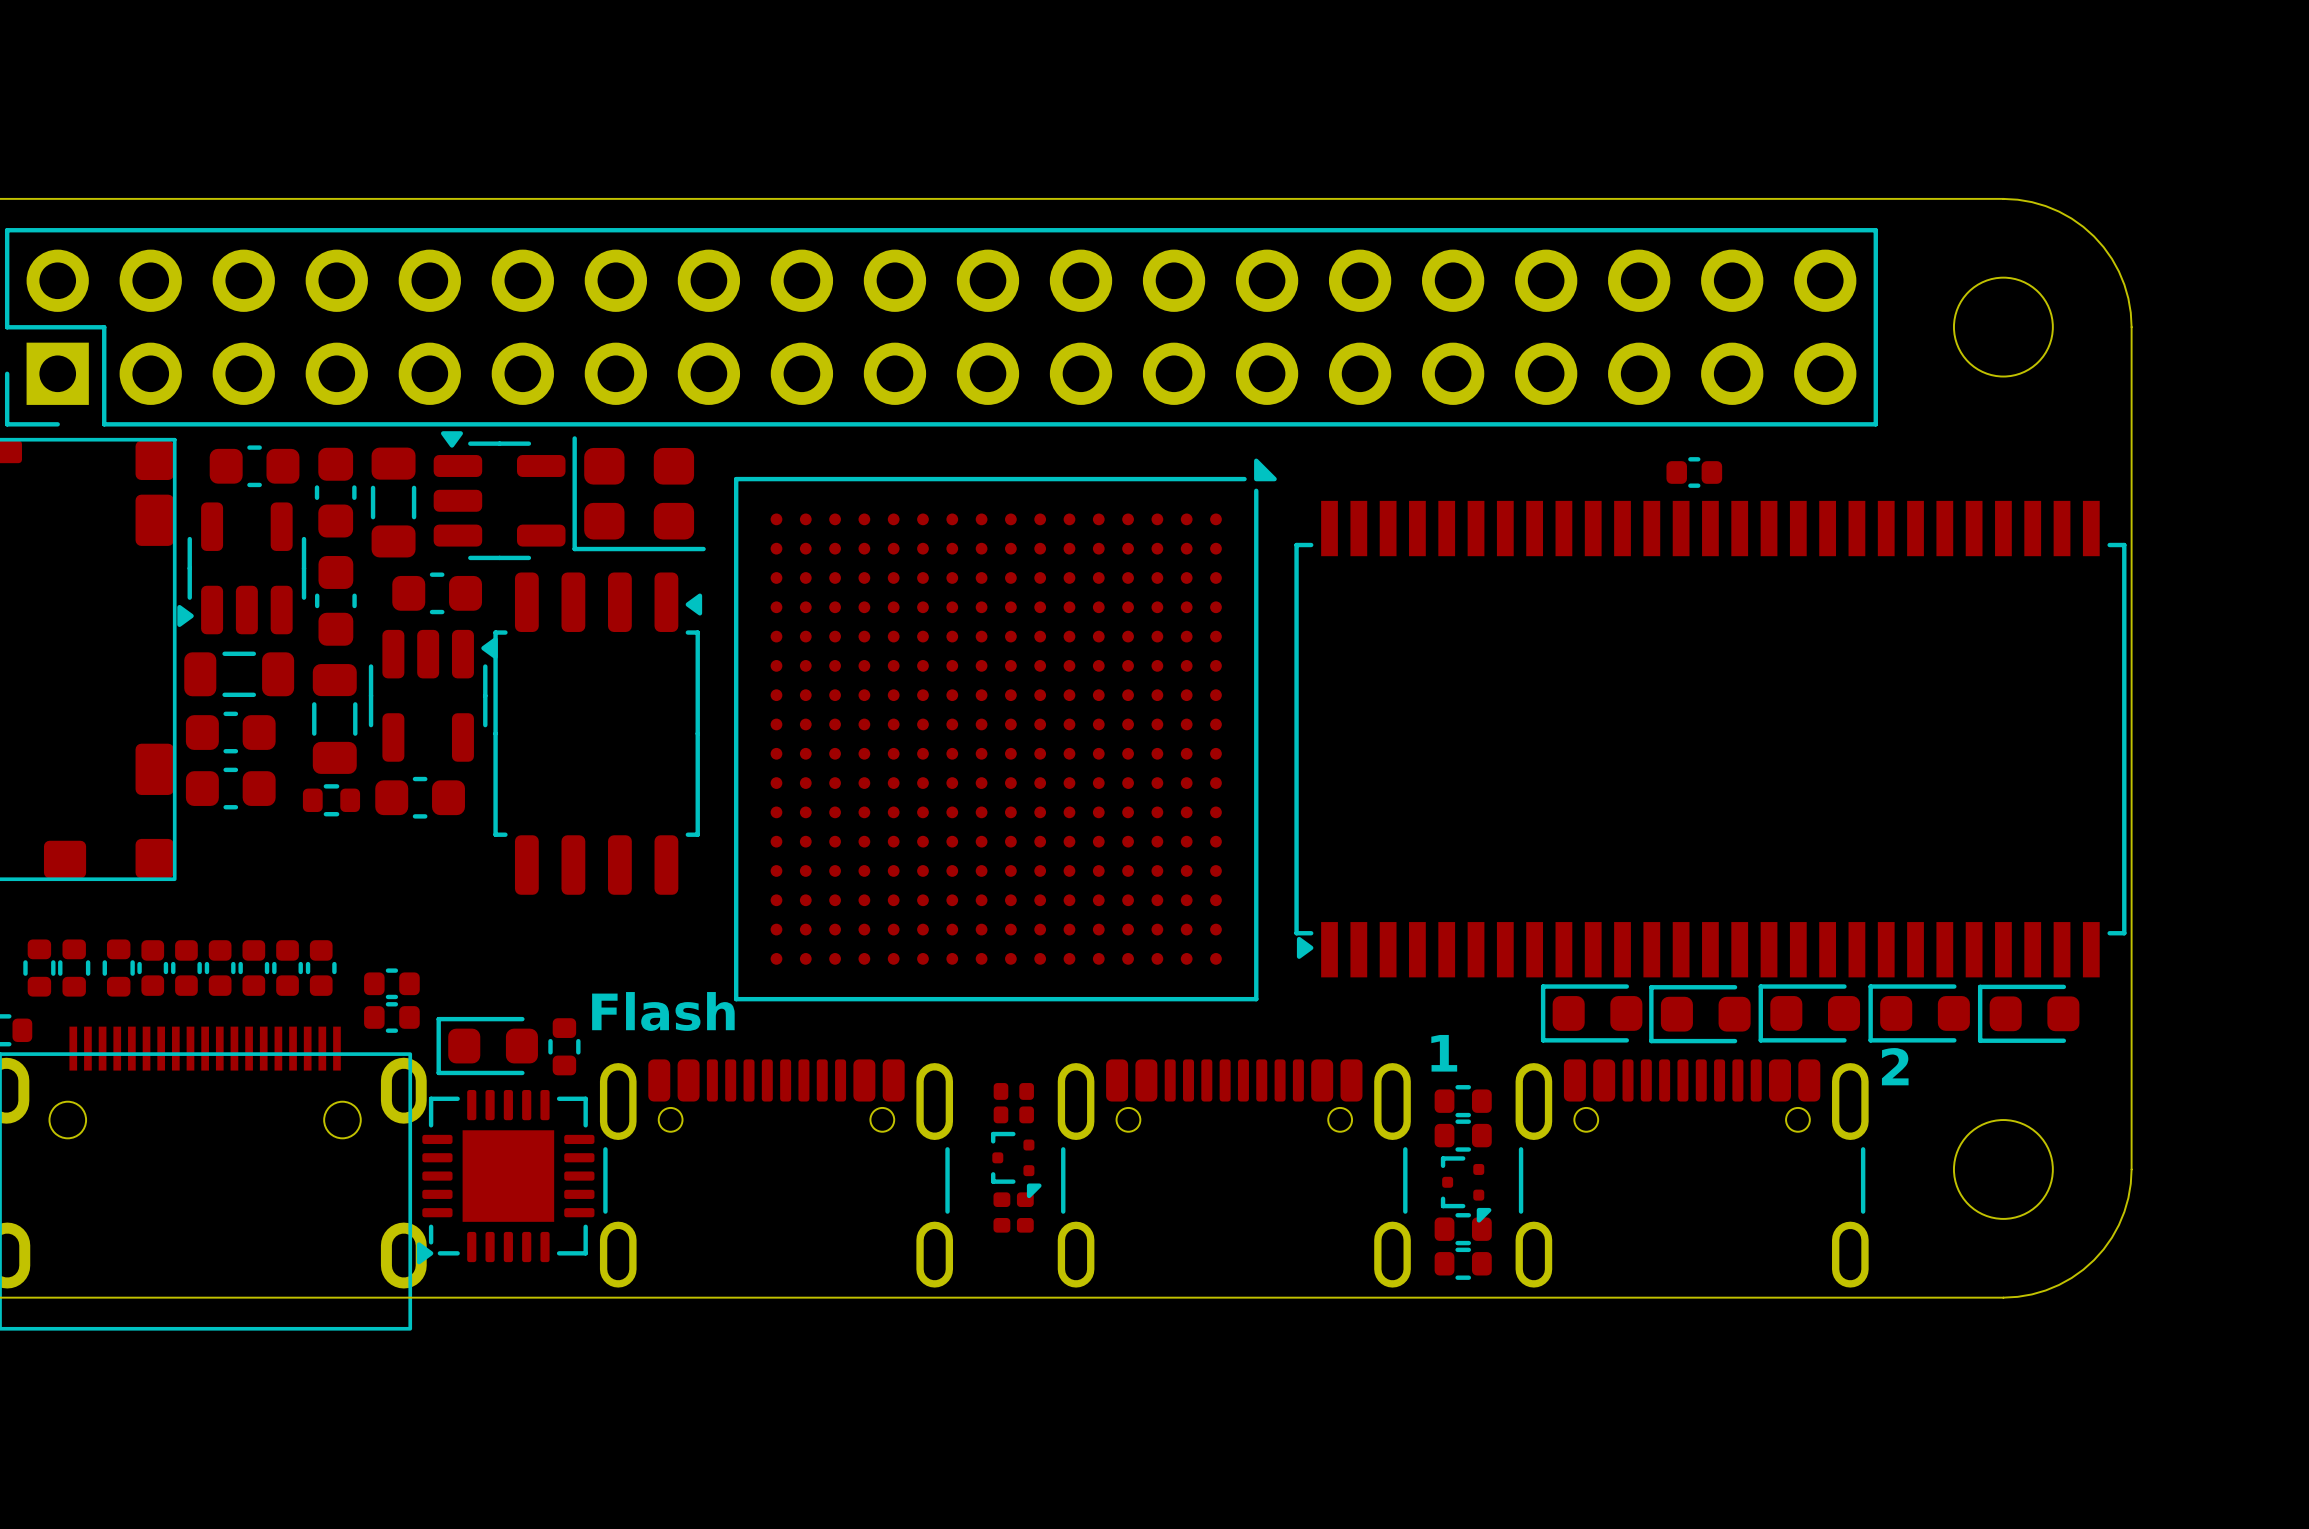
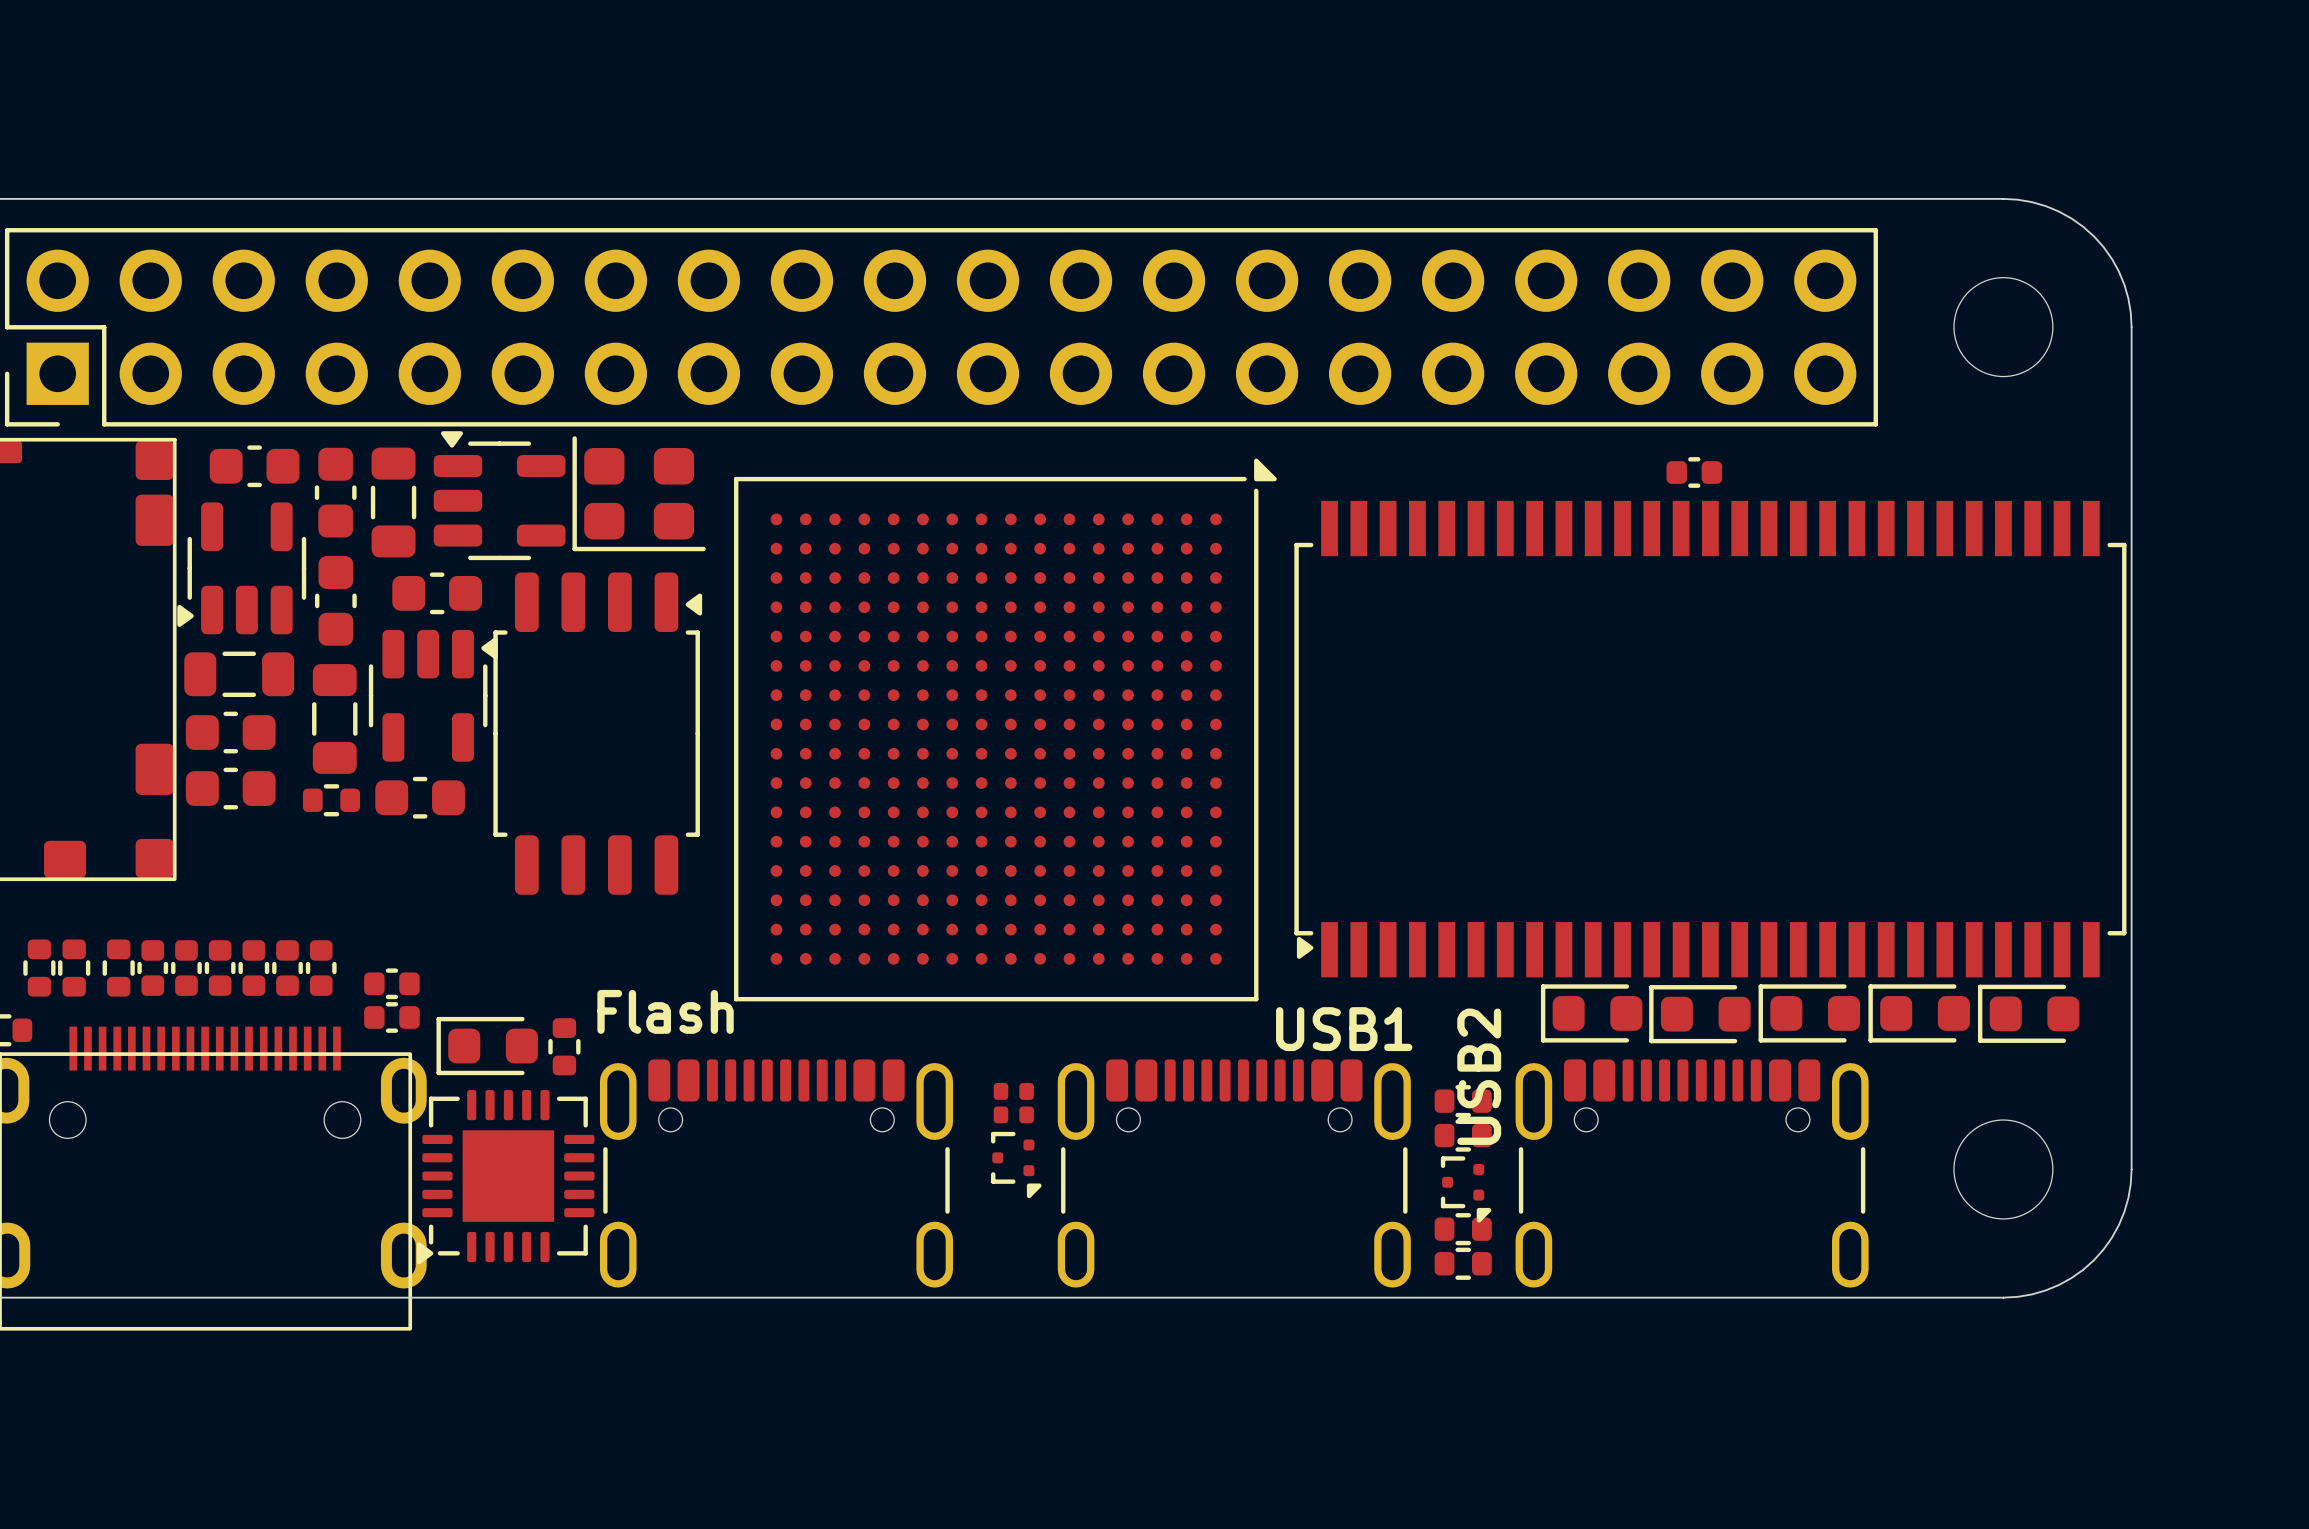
text: none -> USB1 (1344, 1029)
text: 1 (1444, 1053) -> none
text: 2 (1895, 1066) -> none
text: none -> USB2 (1479, 1076)
part: (1013, 1199) -> none
part: (1013, 1225) -> none

